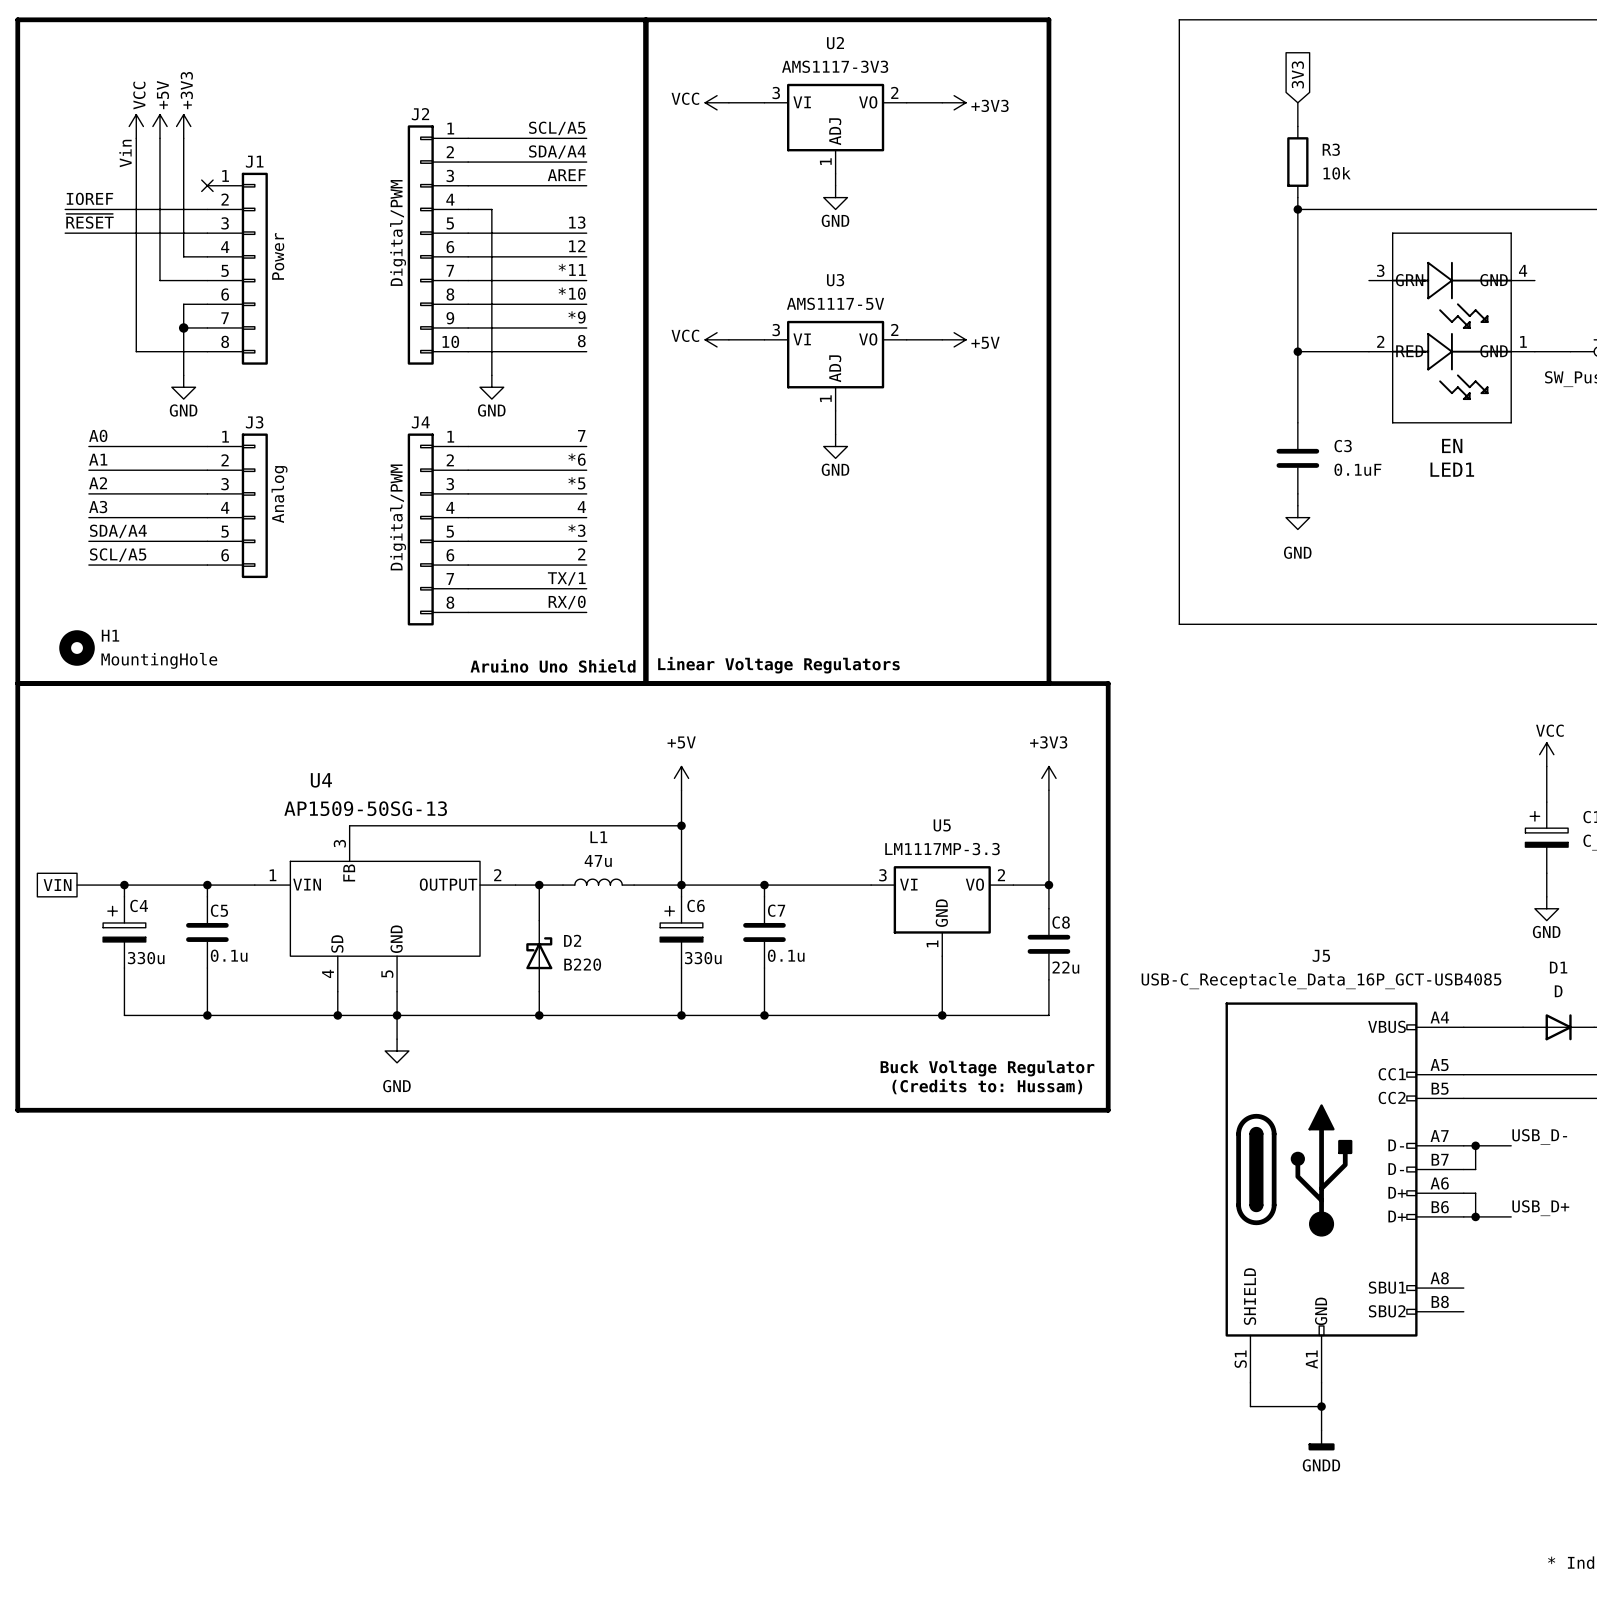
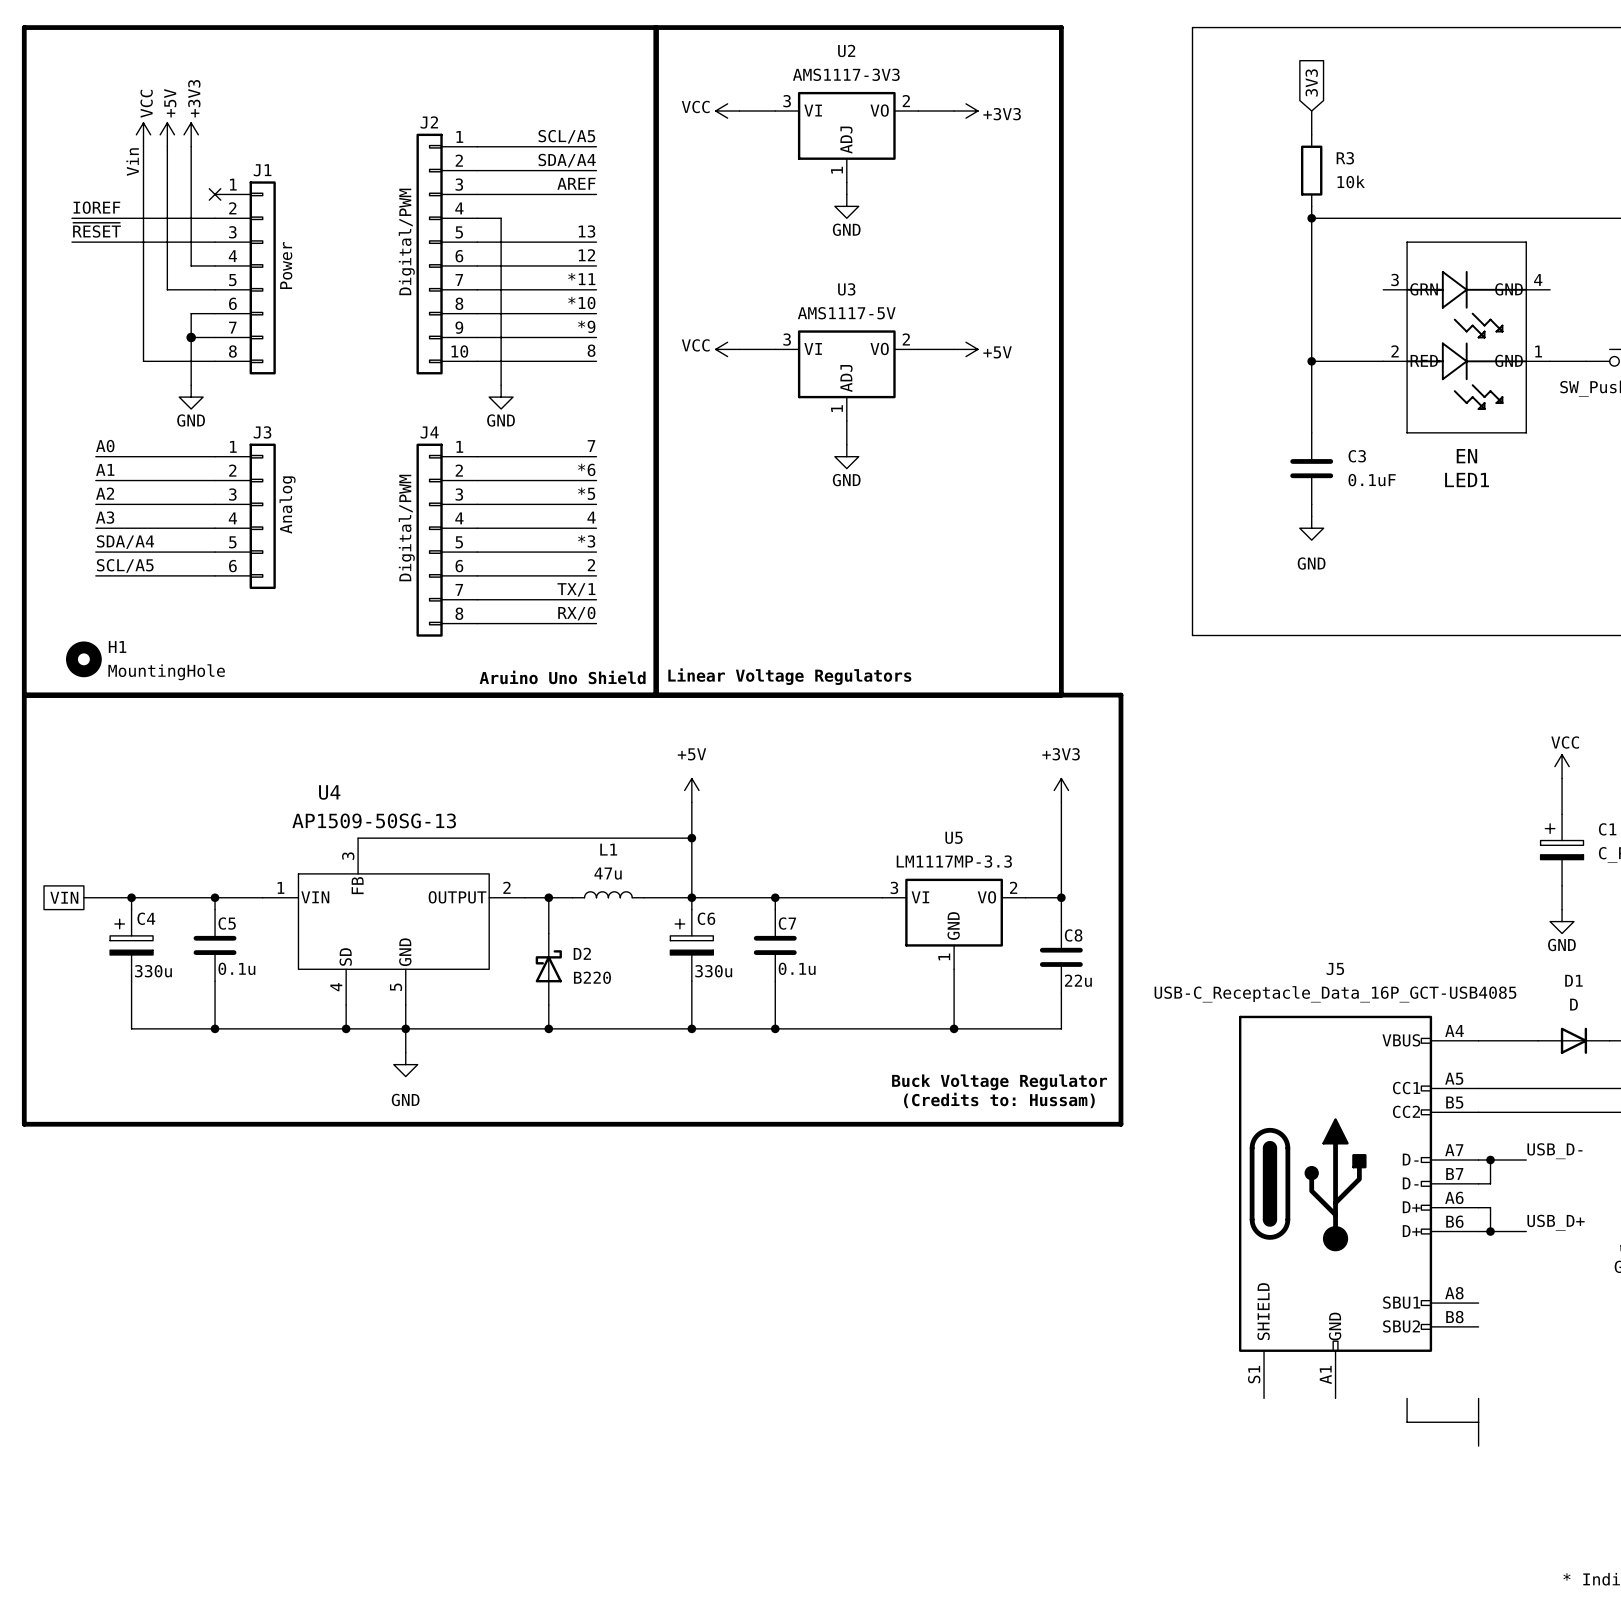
wire: (1250, 1382) (1250, 1406) (1321, 1406) -> (1407, 1398) (1407, 1422) (1478, 1422)
wire: (1321, 1382) (1321, 1430) -> (1478, 1398) (1478, 1446)
junction: (1321, 1406) -> none
power symbol: GNDD (1321, 1440) -> none

